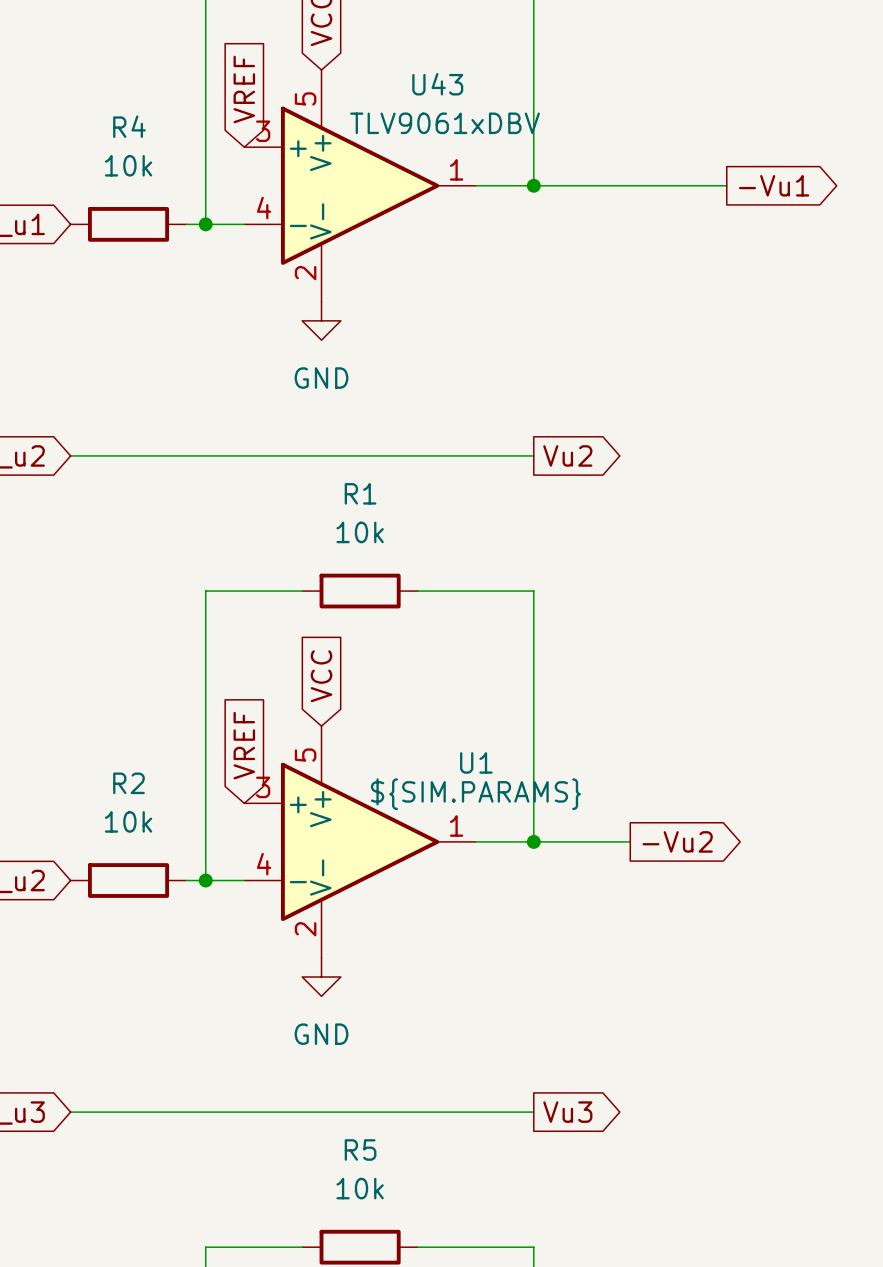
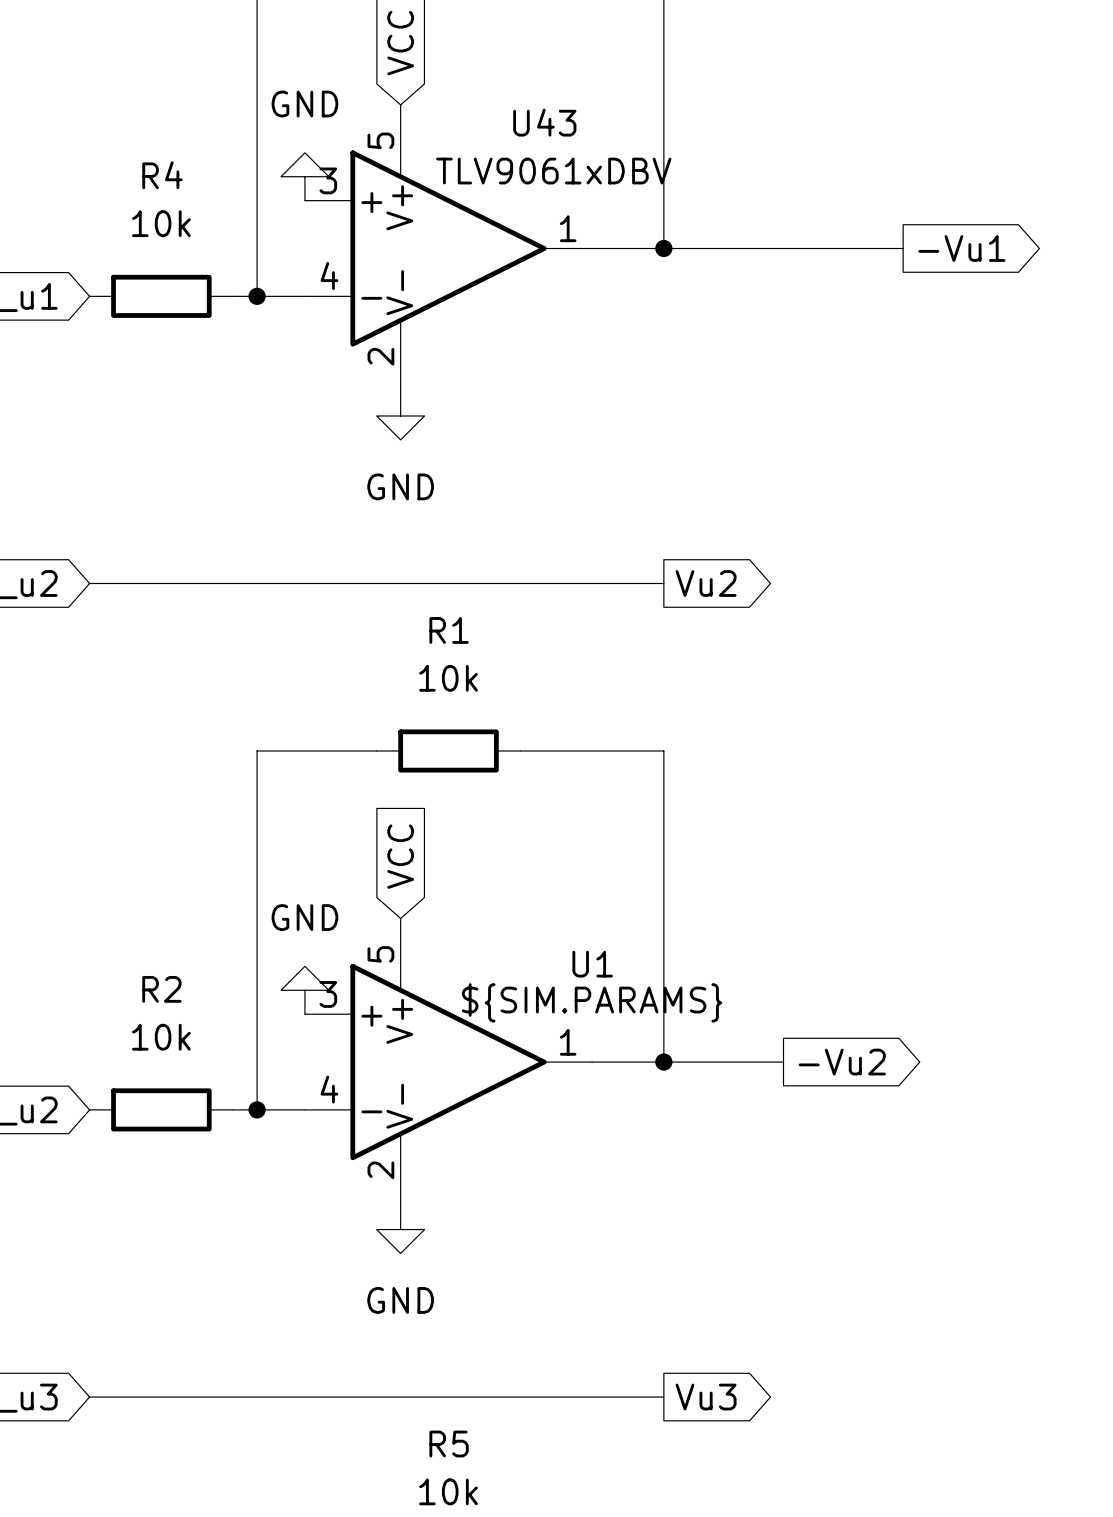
global label: VREF (244, 89) -> none
power symbol: none -> GND (304, 176)
global label: VREF (244, 745) -> none
power symbol: none -> GND (304, 990)

